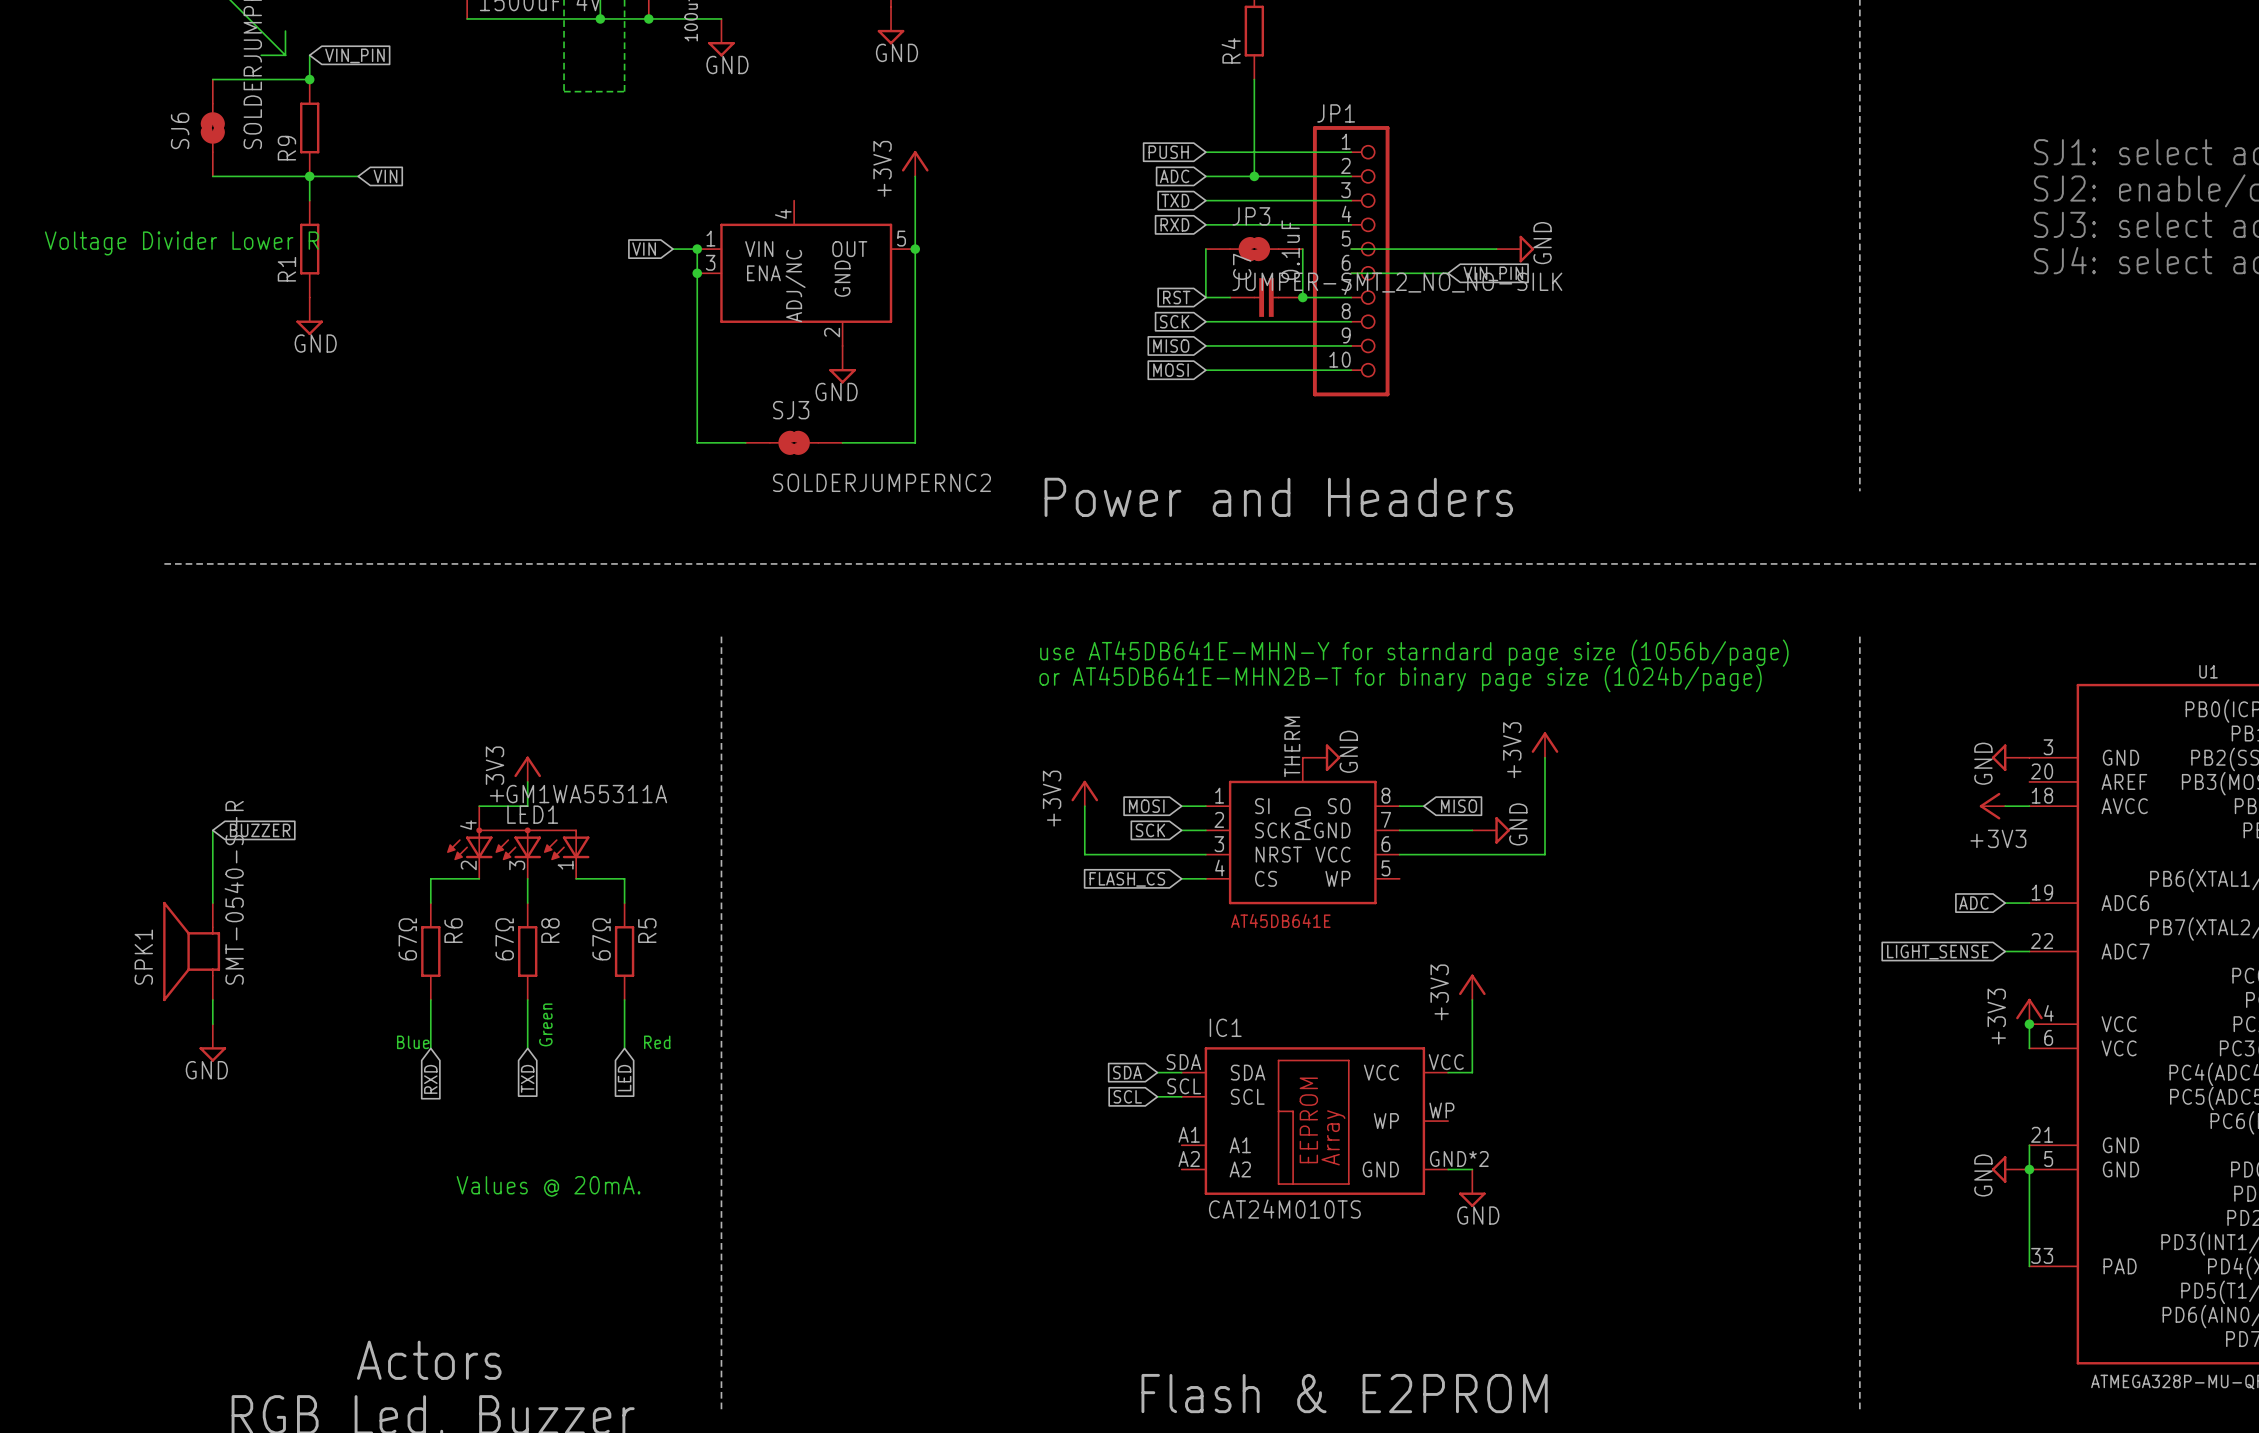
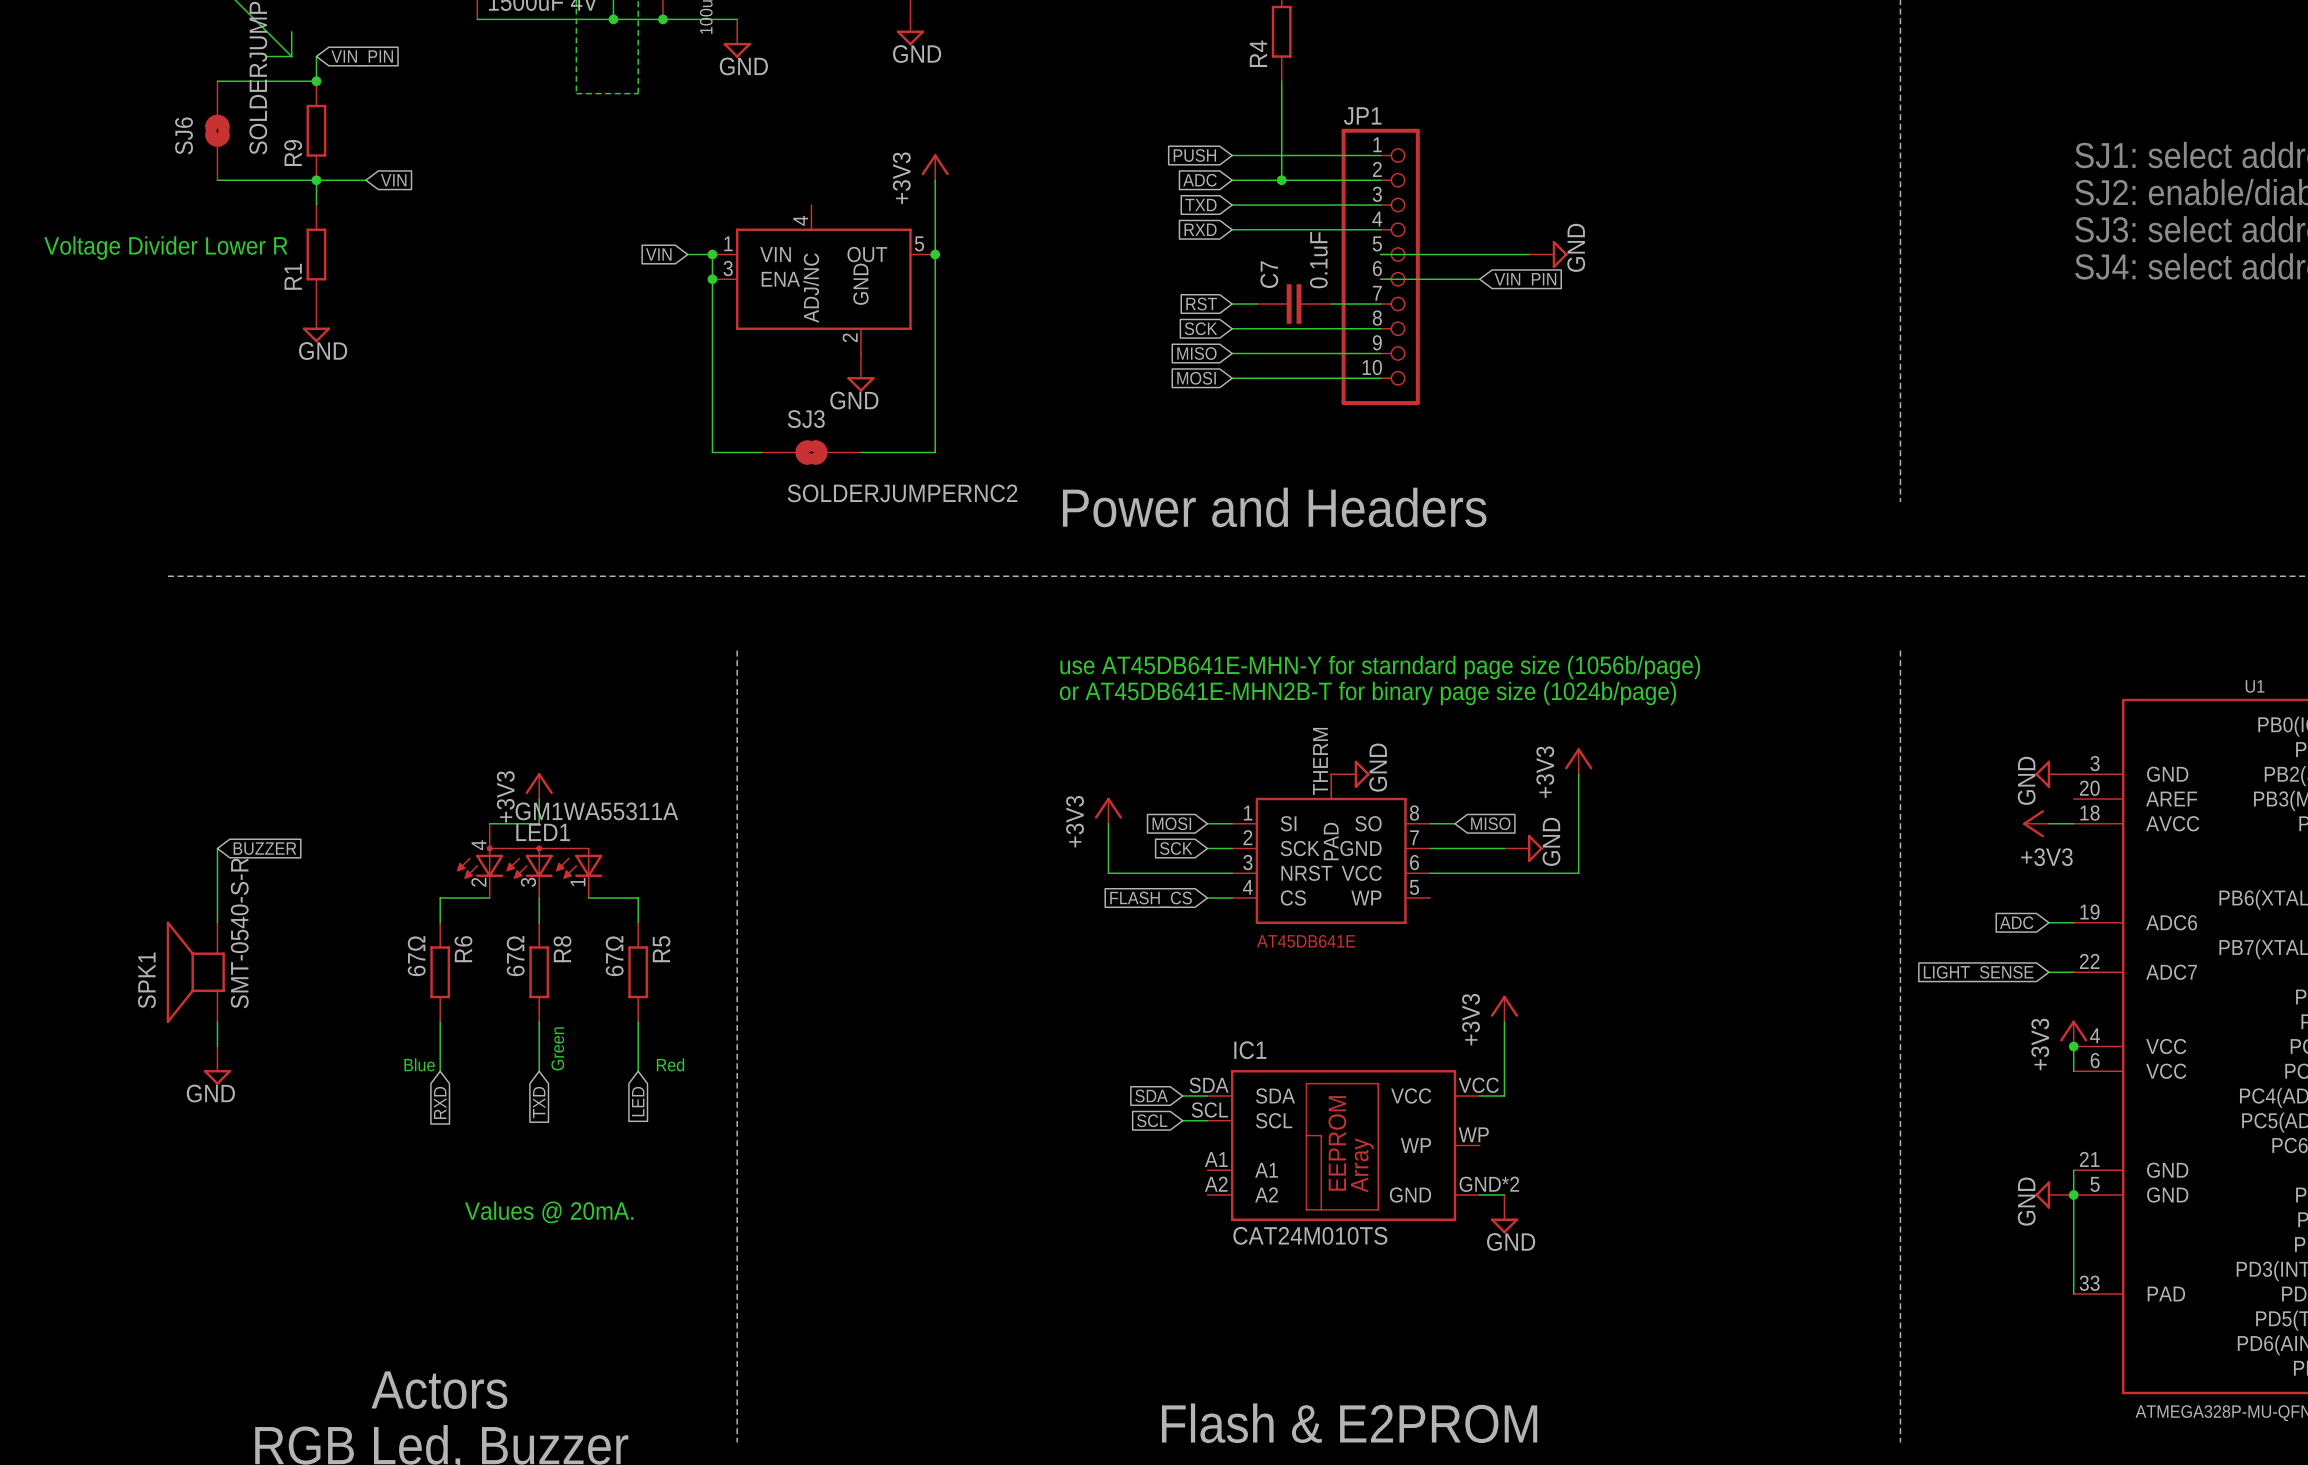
wire: (1205, 249) (1205, 297) -> none
JP3: JUMPER-SMT_2_NO_NO-SILK (1254, 249) -> none
wire: (1302, 249) (1302, 297) -> none
junction: (1302, 297) -> none

